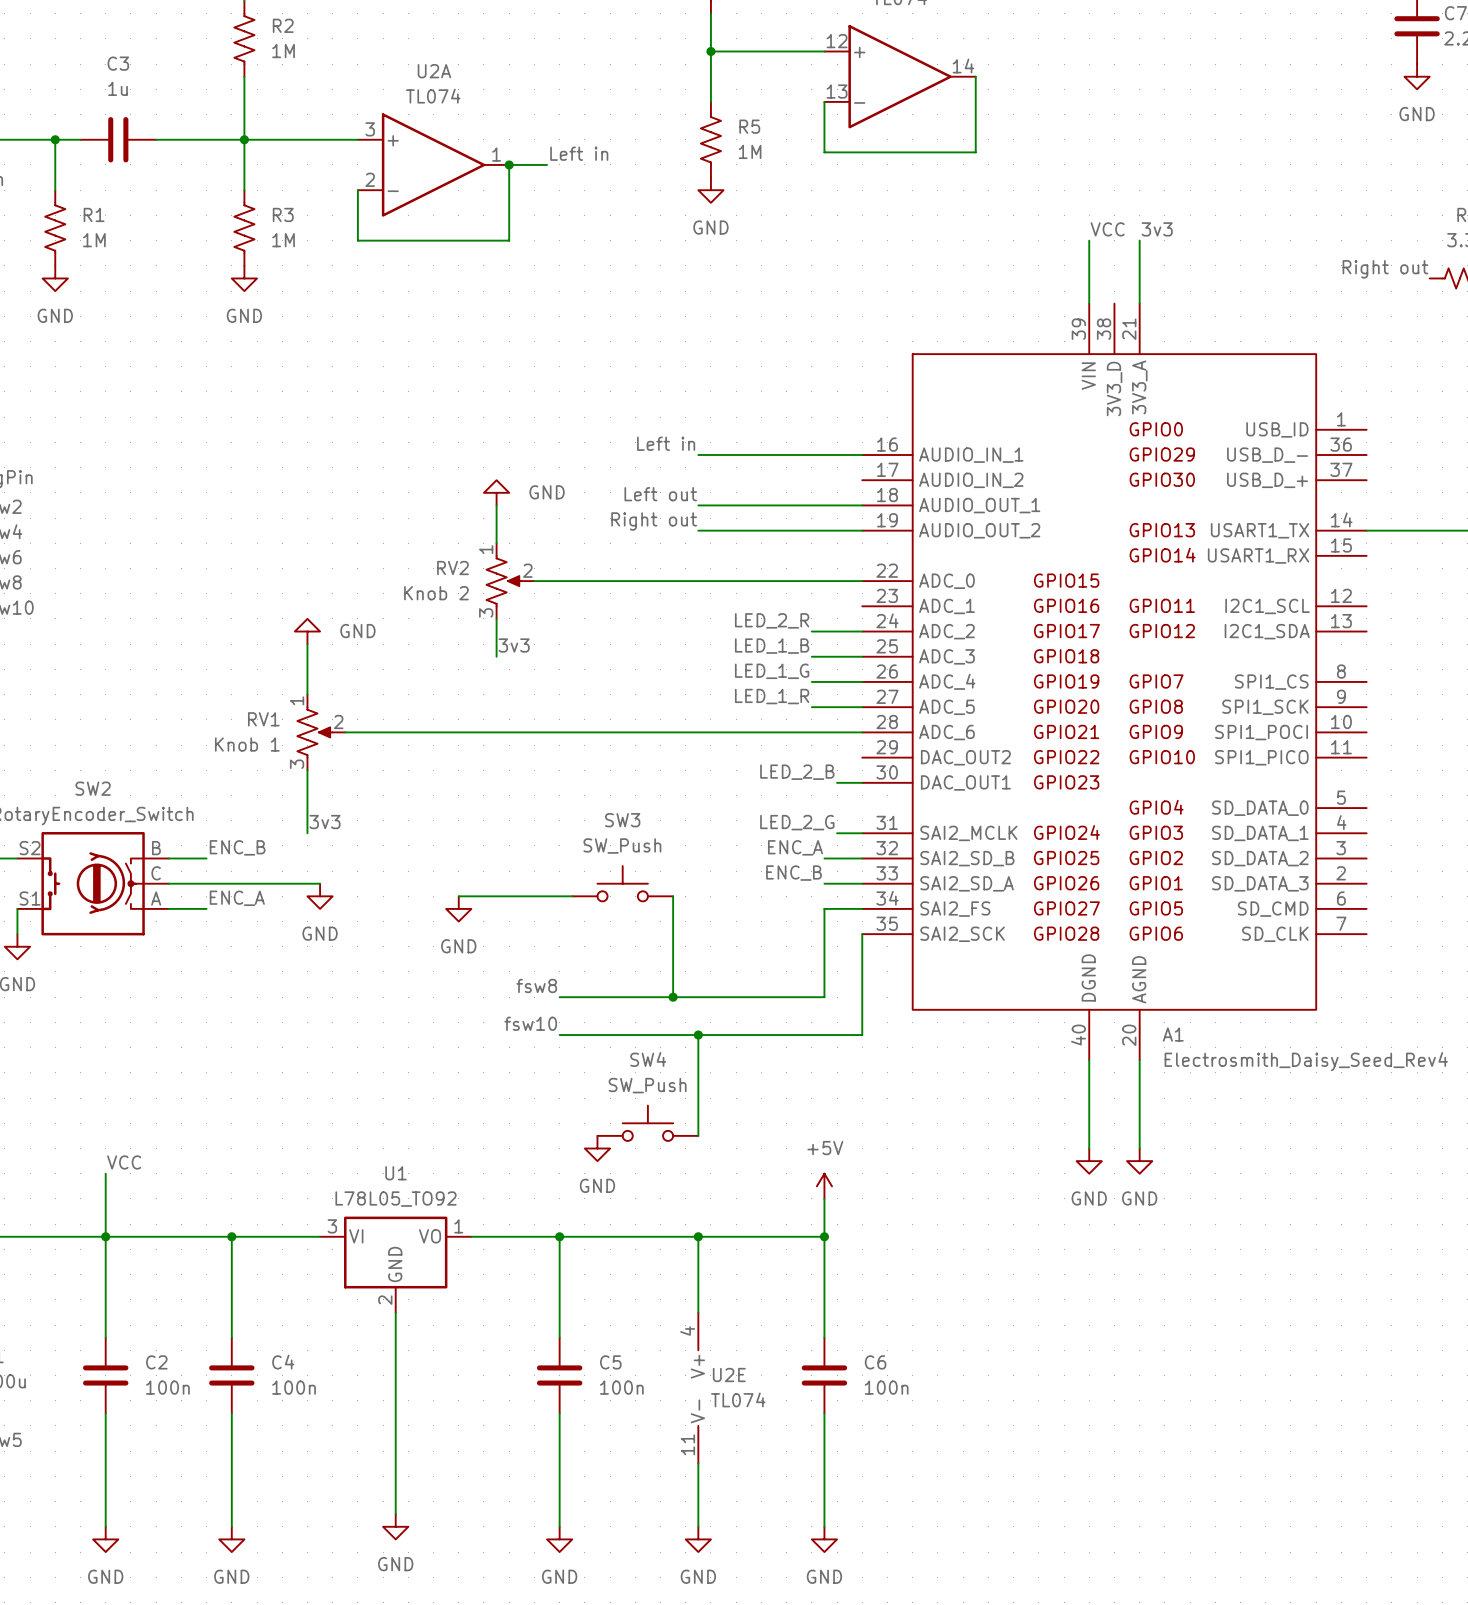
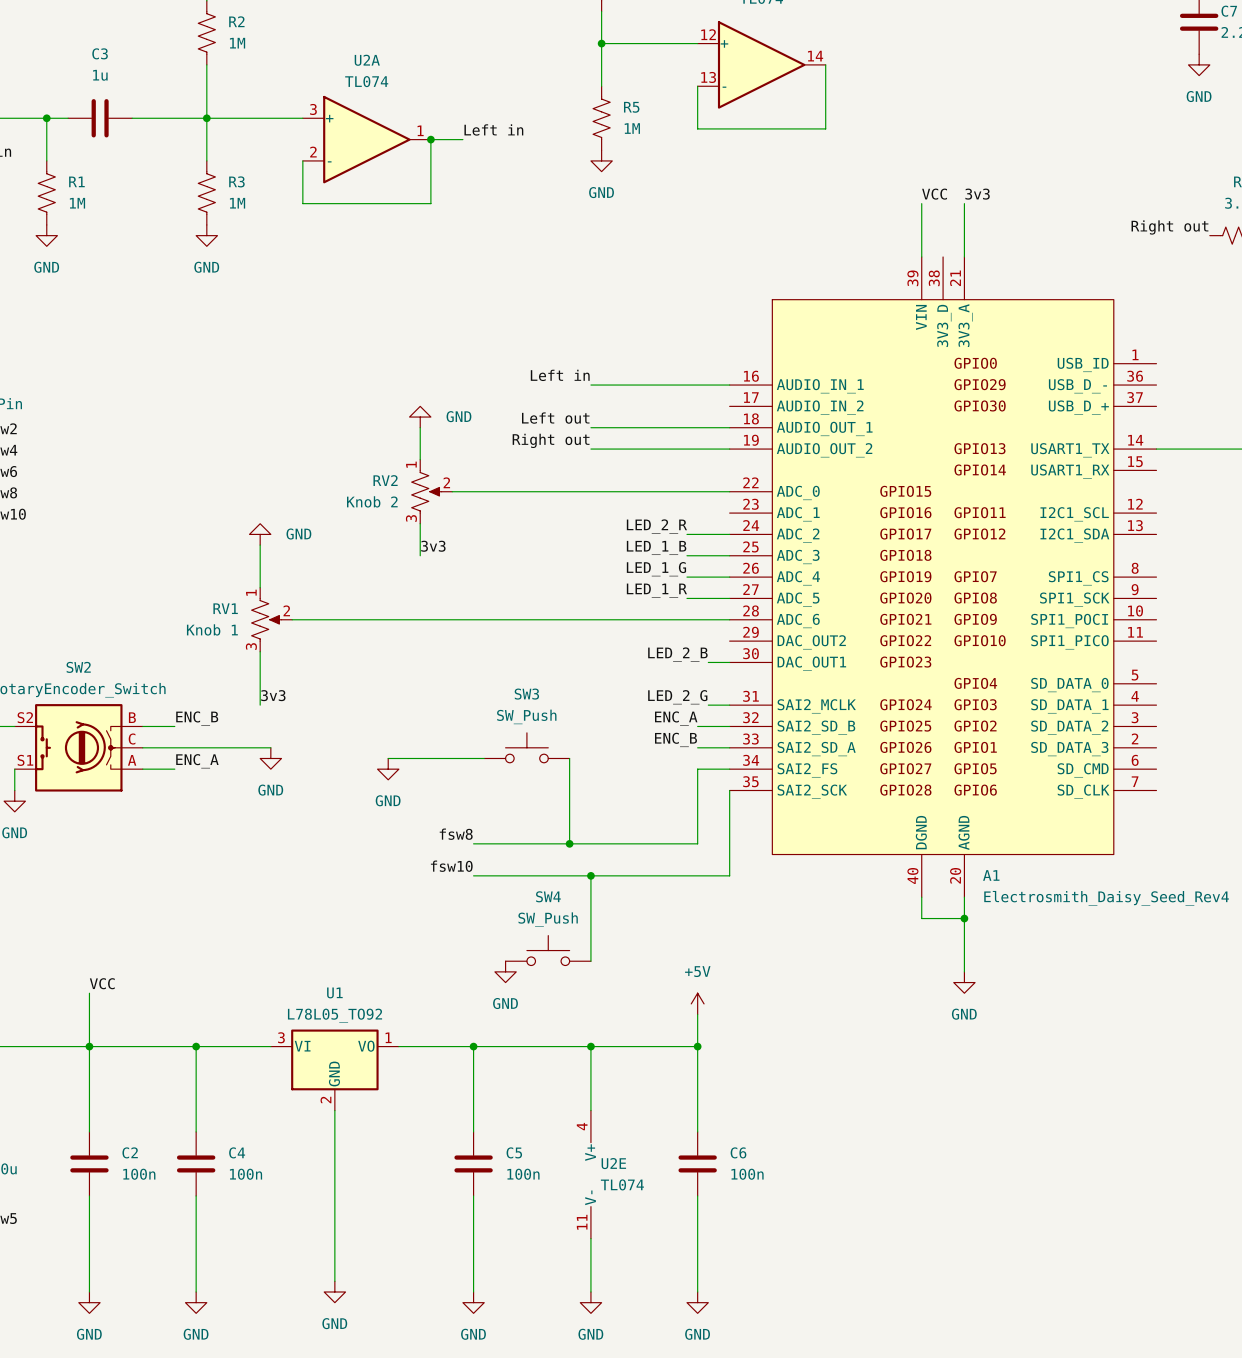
wire: (1089, 1085) (1089, 1148) -> (921, 918) (964, 918)
junction: none -> (964, 918)
power symbol: GND (1089, 1161) -> none

